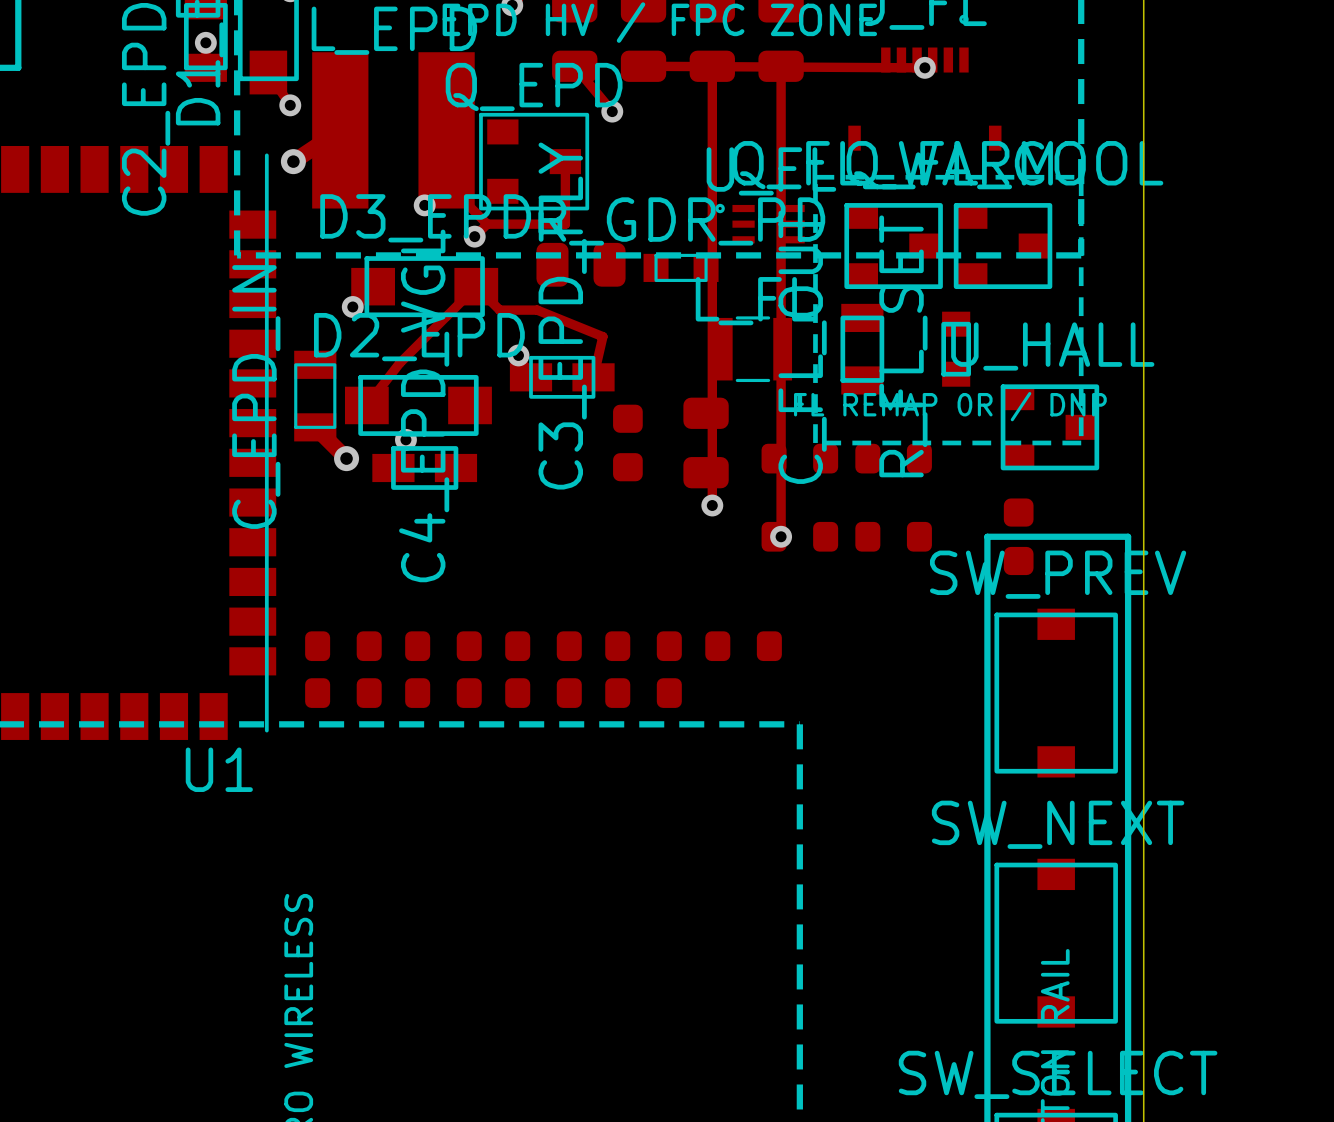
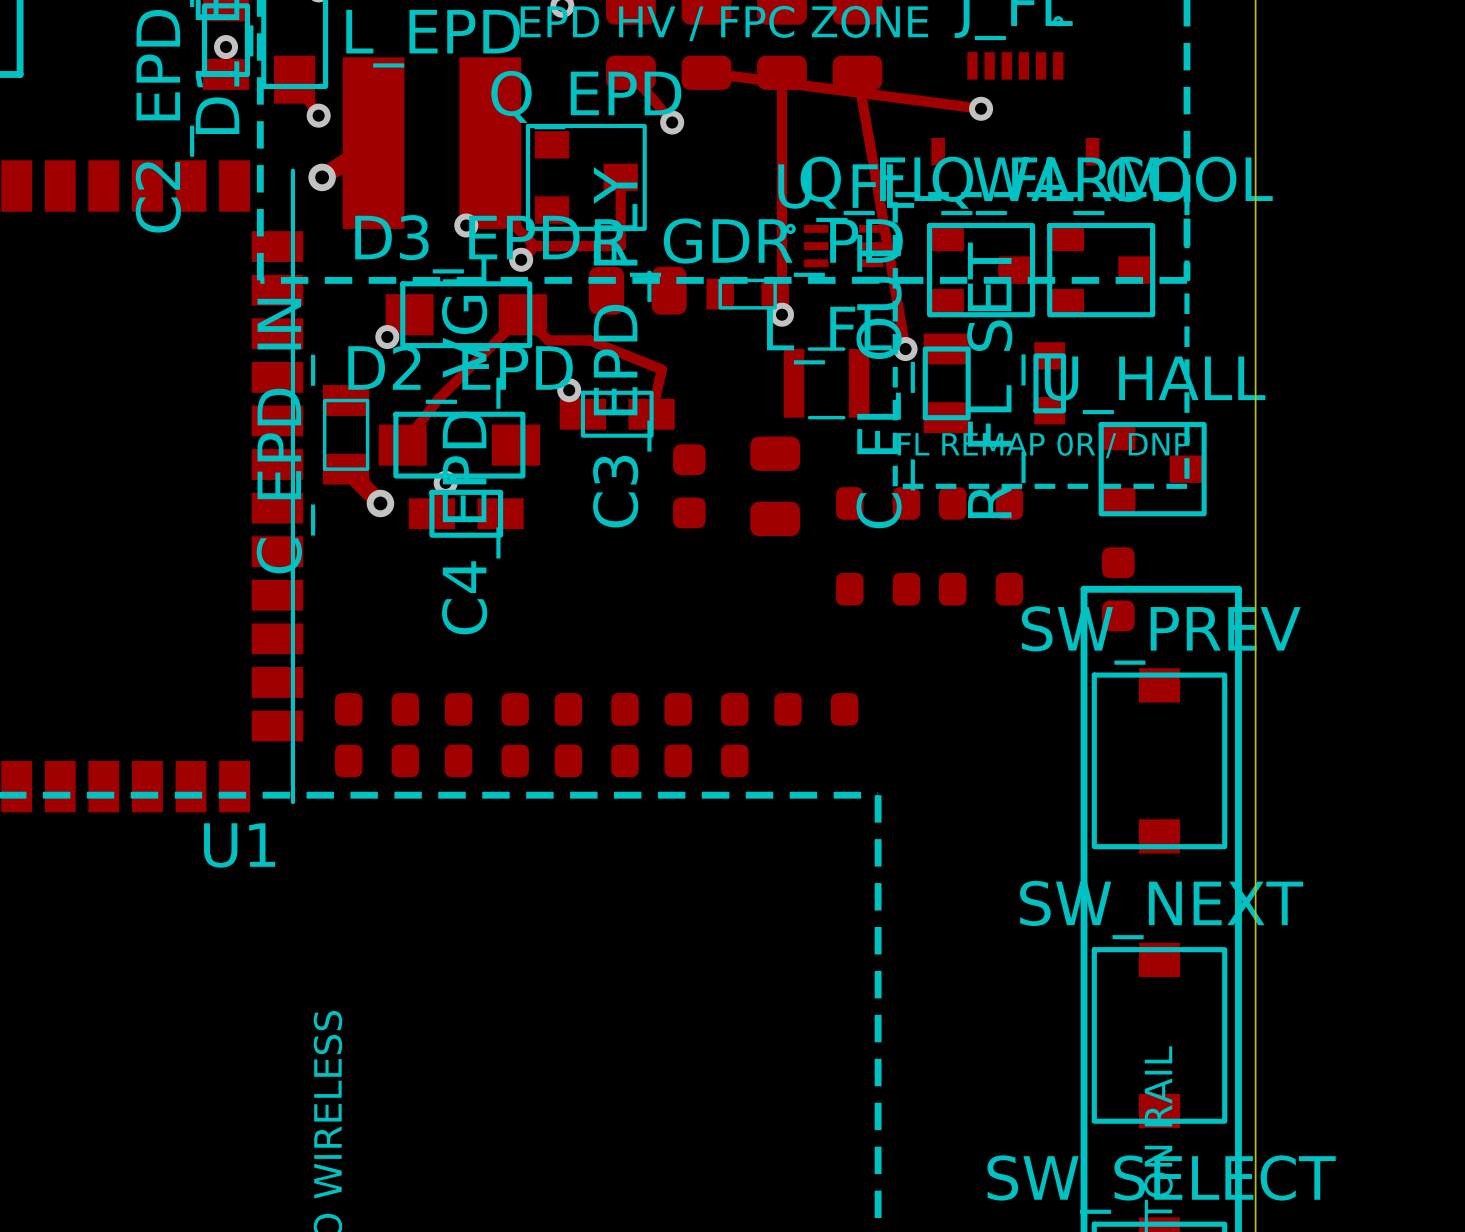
track: (643, 66) (924, 67) -> (706, 72) (981, 108)
track: (781, 66) (781, 536) -> (857, 72) (905, 349)
via position: (924, 67) -> (981, 108)
track: (712, 286) (712, 505) -> none
via: none -> (782, 314)
via: none -> (905, 349)
via: (712, 505) -> none
via: (781, 536) -> none

